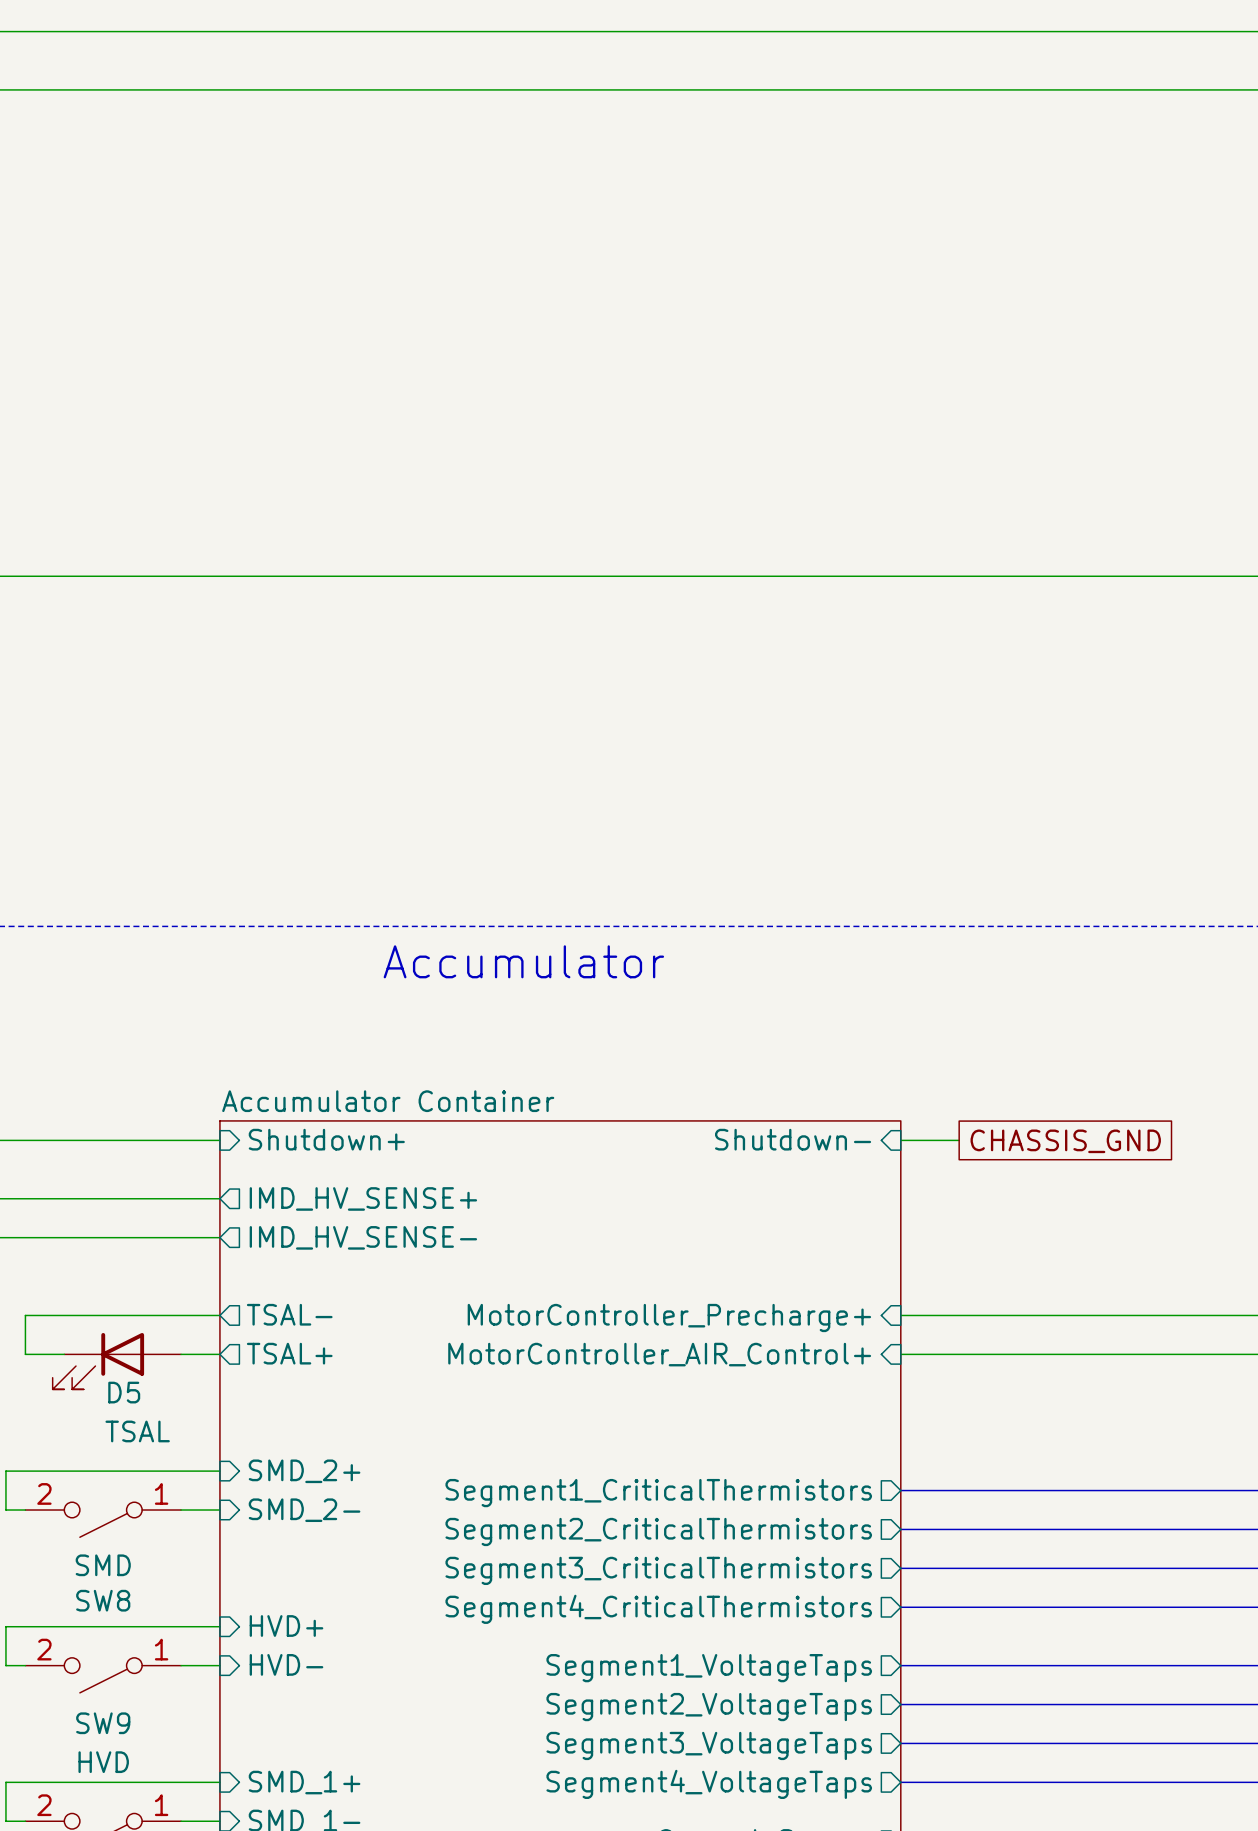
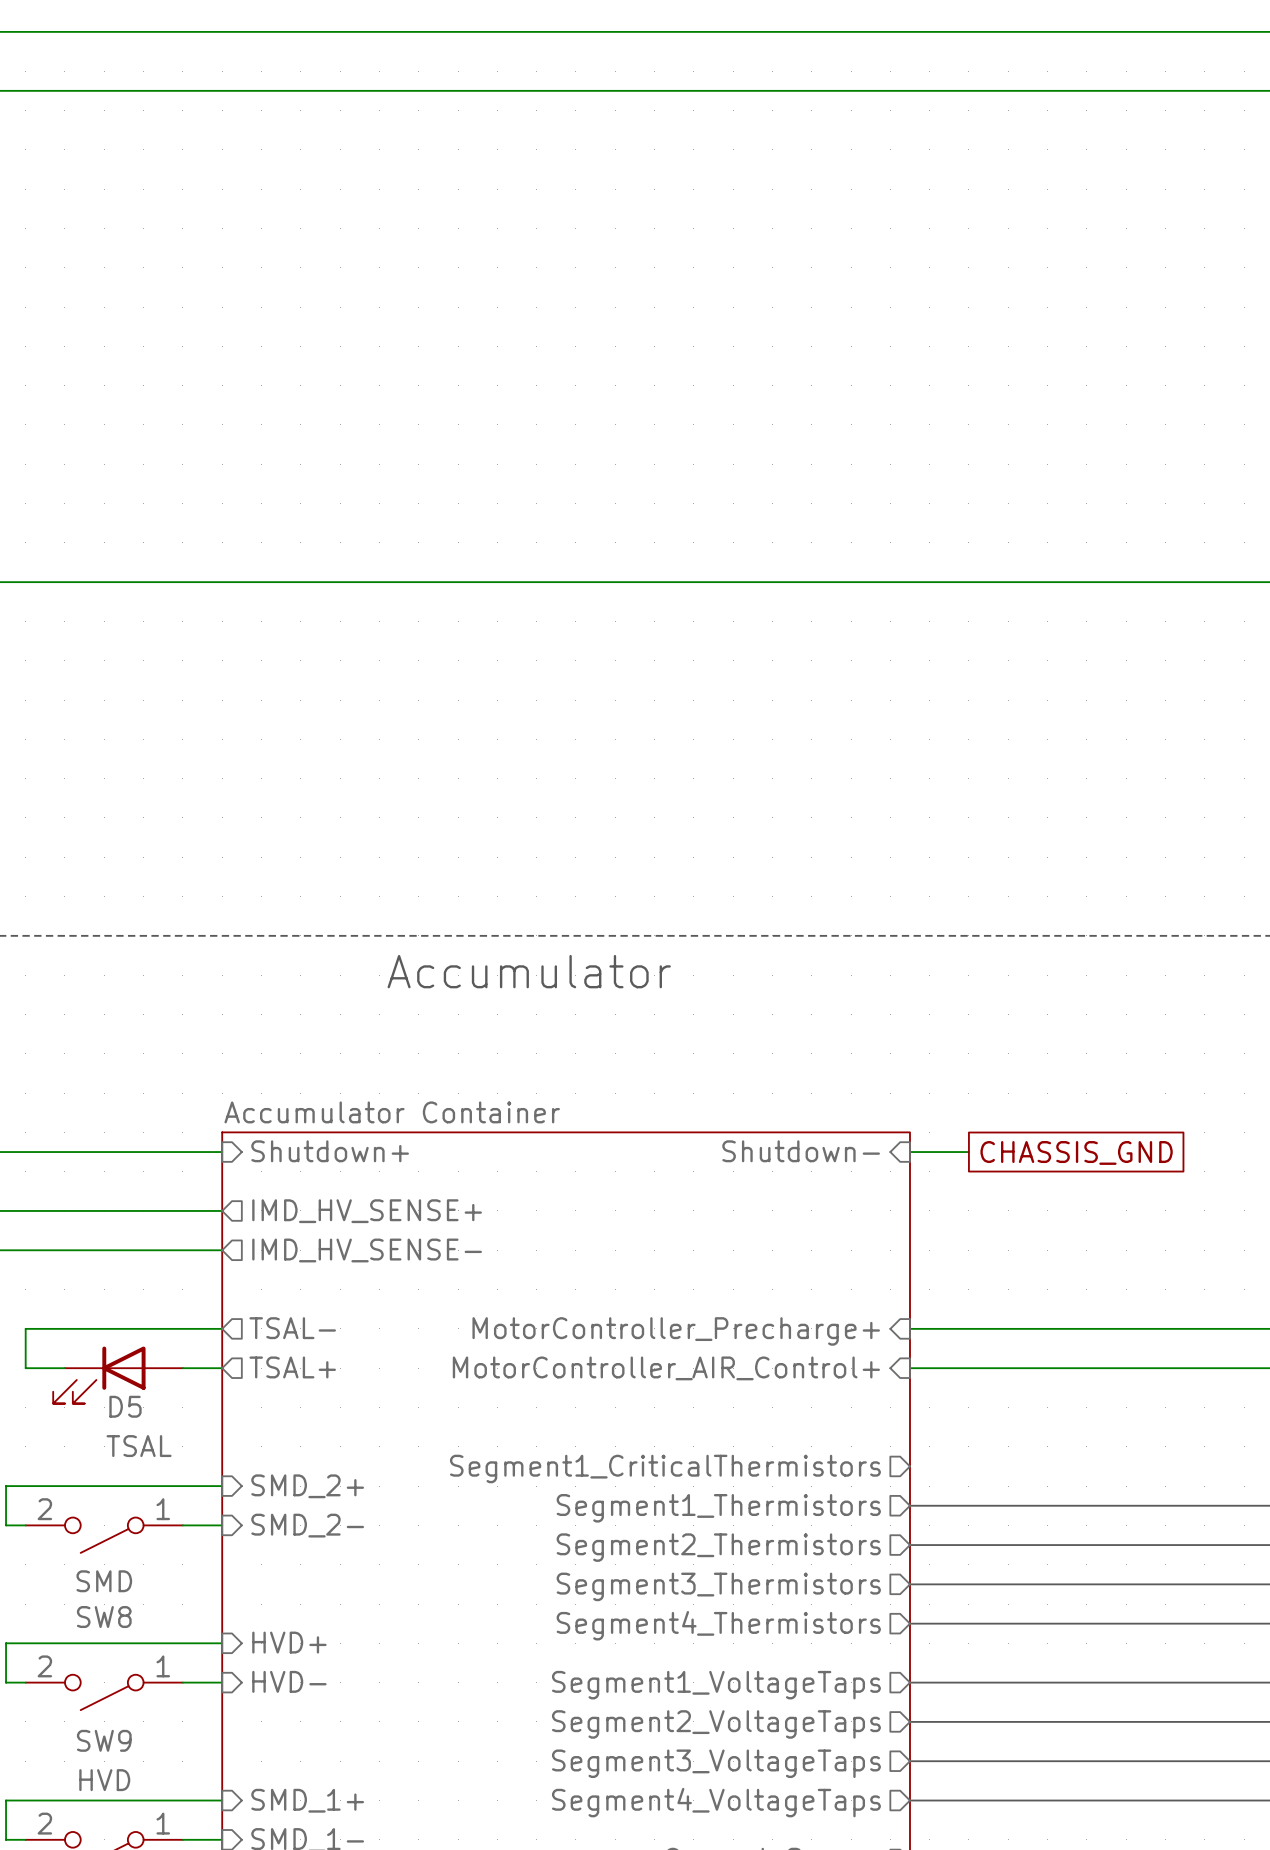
sheet pin: none -> Segment1_CriticalThermistors (665, 1468)
sheet pin: Segment1_CriticalThermistors (658, 1493) -> Segment1_Thermistors (718, 1508)
sheet pin: Segment2_CriticalThermistors (658, 1531) -> Segment2_Thermistors (718, 1547)
sheet pin: Segment3_CriticalThermistors (658, 1570) -> Segment3_Thermistors (718, 1586)
sheet pin: Segment4_CriticalThermistors (658, 1609) -> Segment4_Thermistors (718, 1625)

